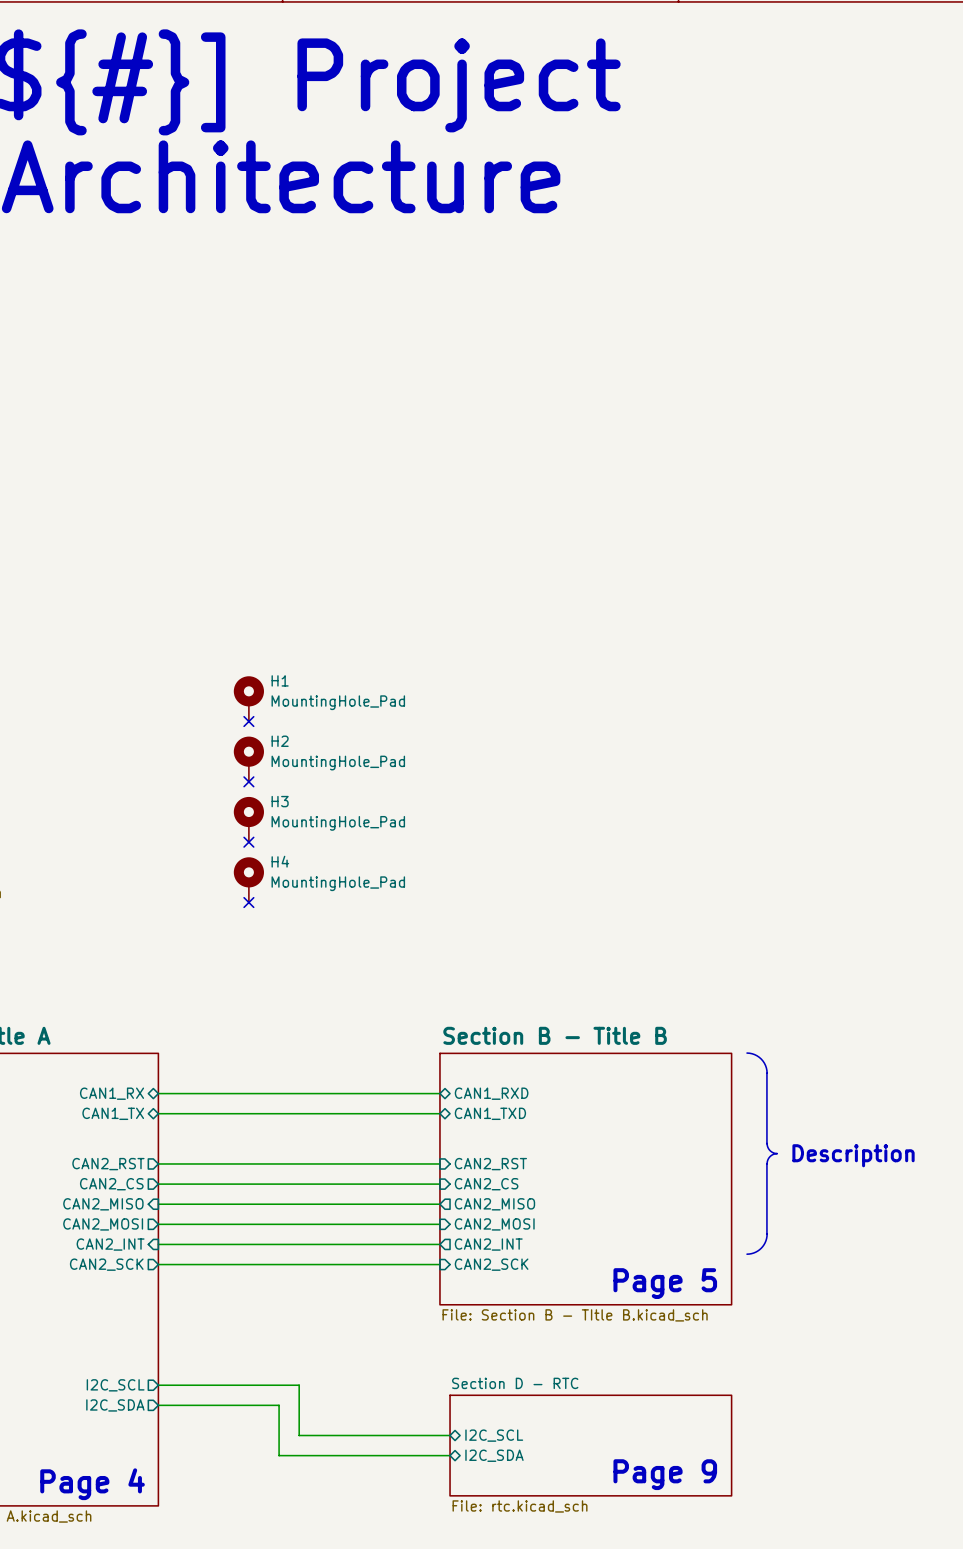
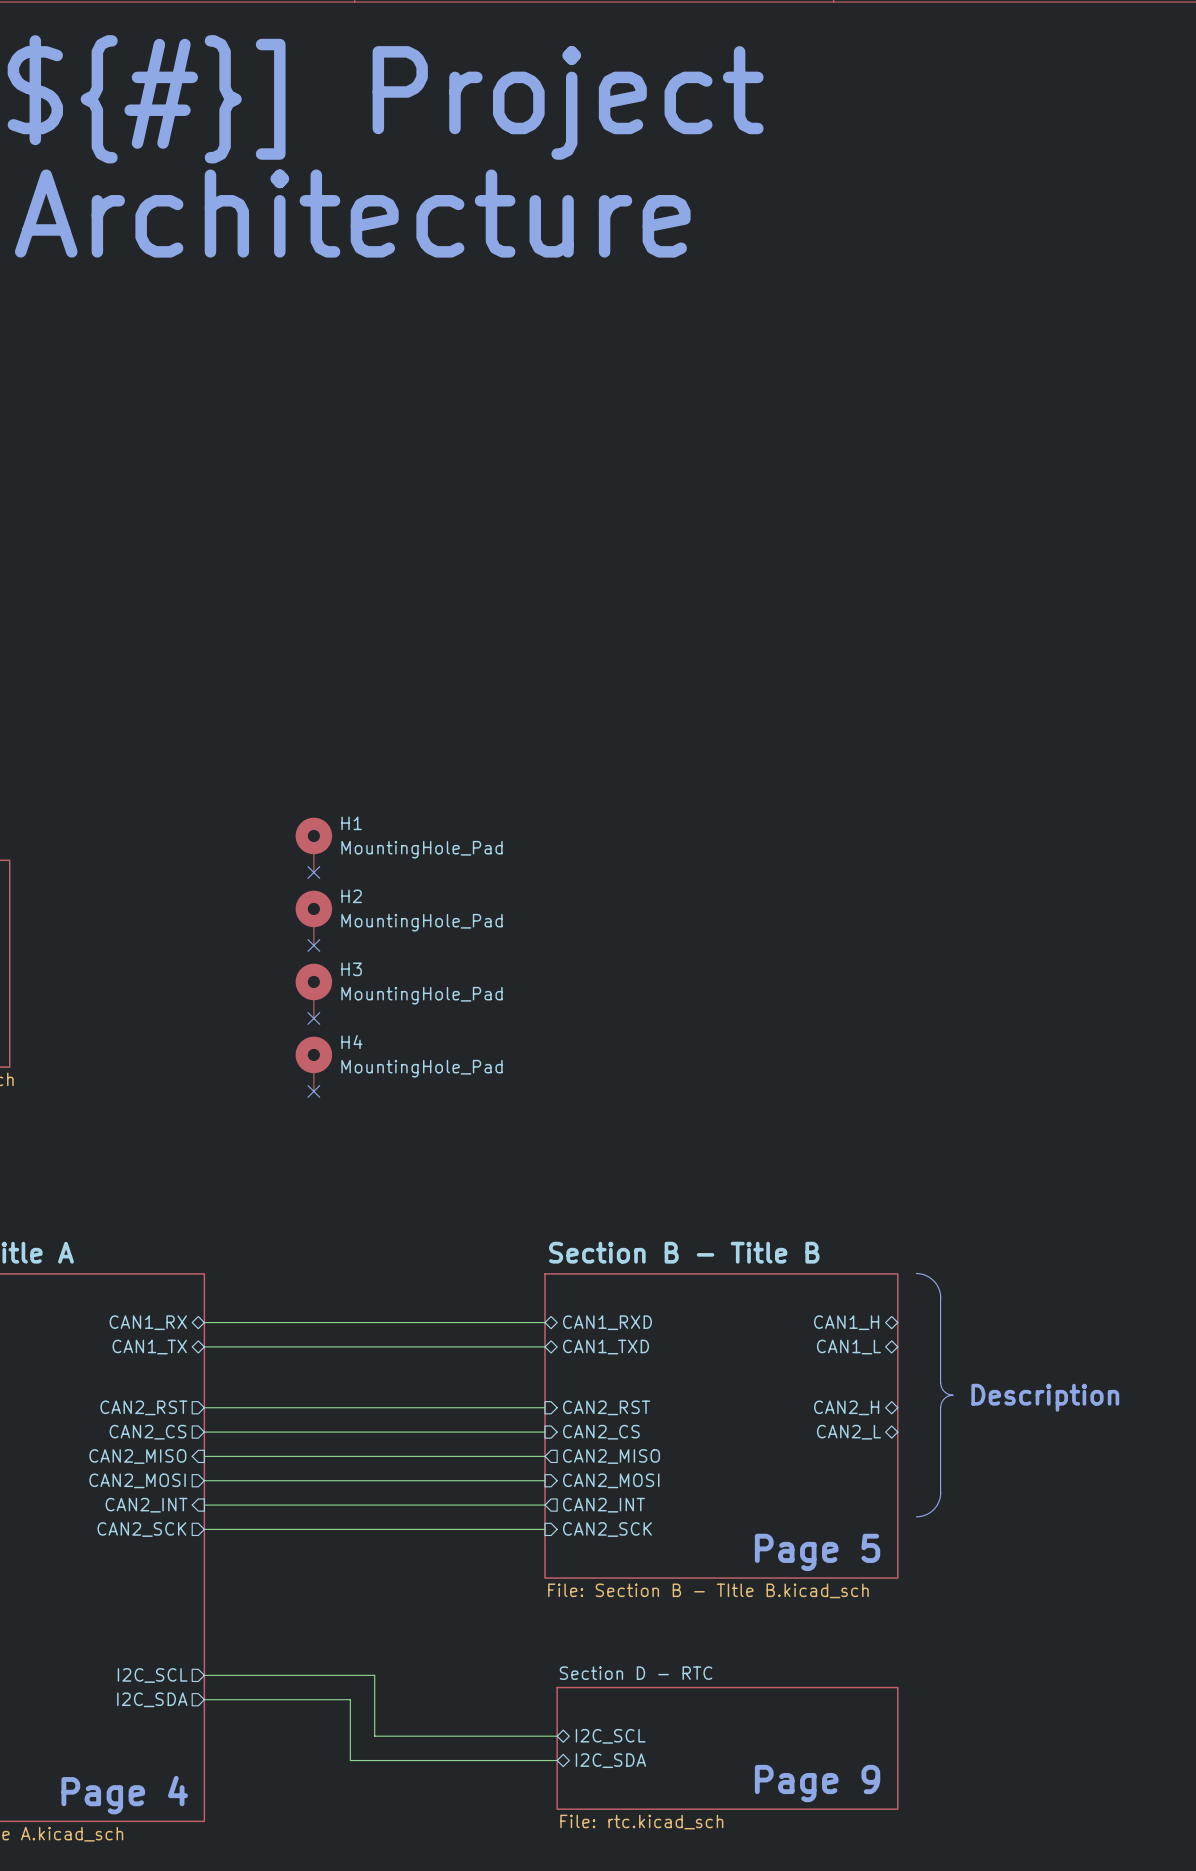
sheet pin: none -> CAN1_H (846, 1322)
sheet pin: none -> CAN1_L (848, 1347)
sheet pin: none -> CAN2_H (846, 1407)
sheet pin: none -> CAN2_L (848, 1432)

